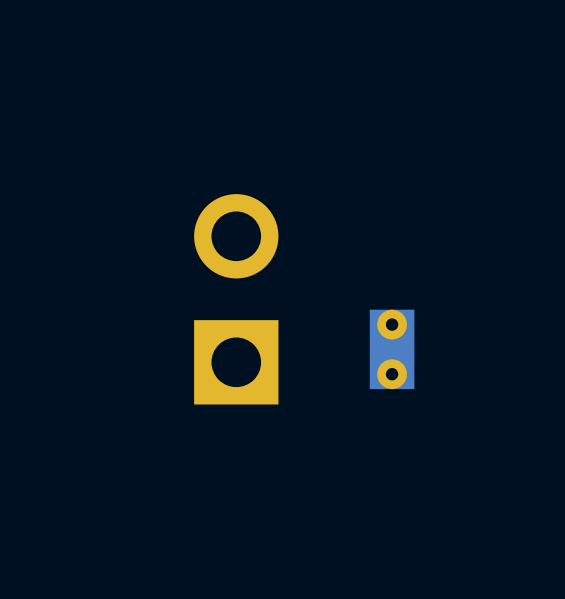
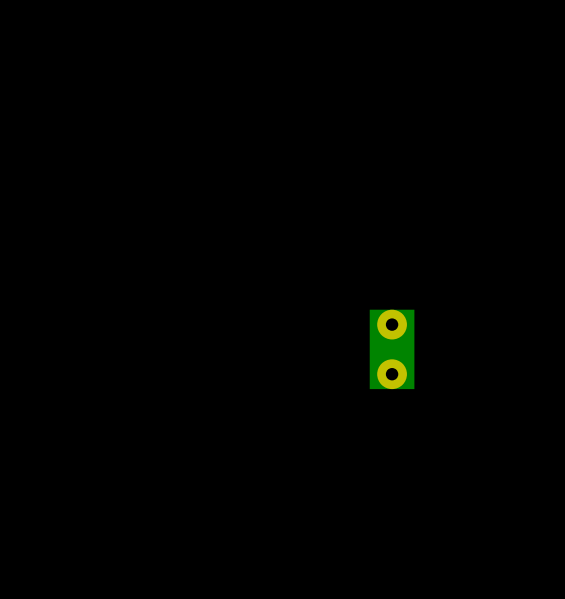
part: (236, 299) -> none

